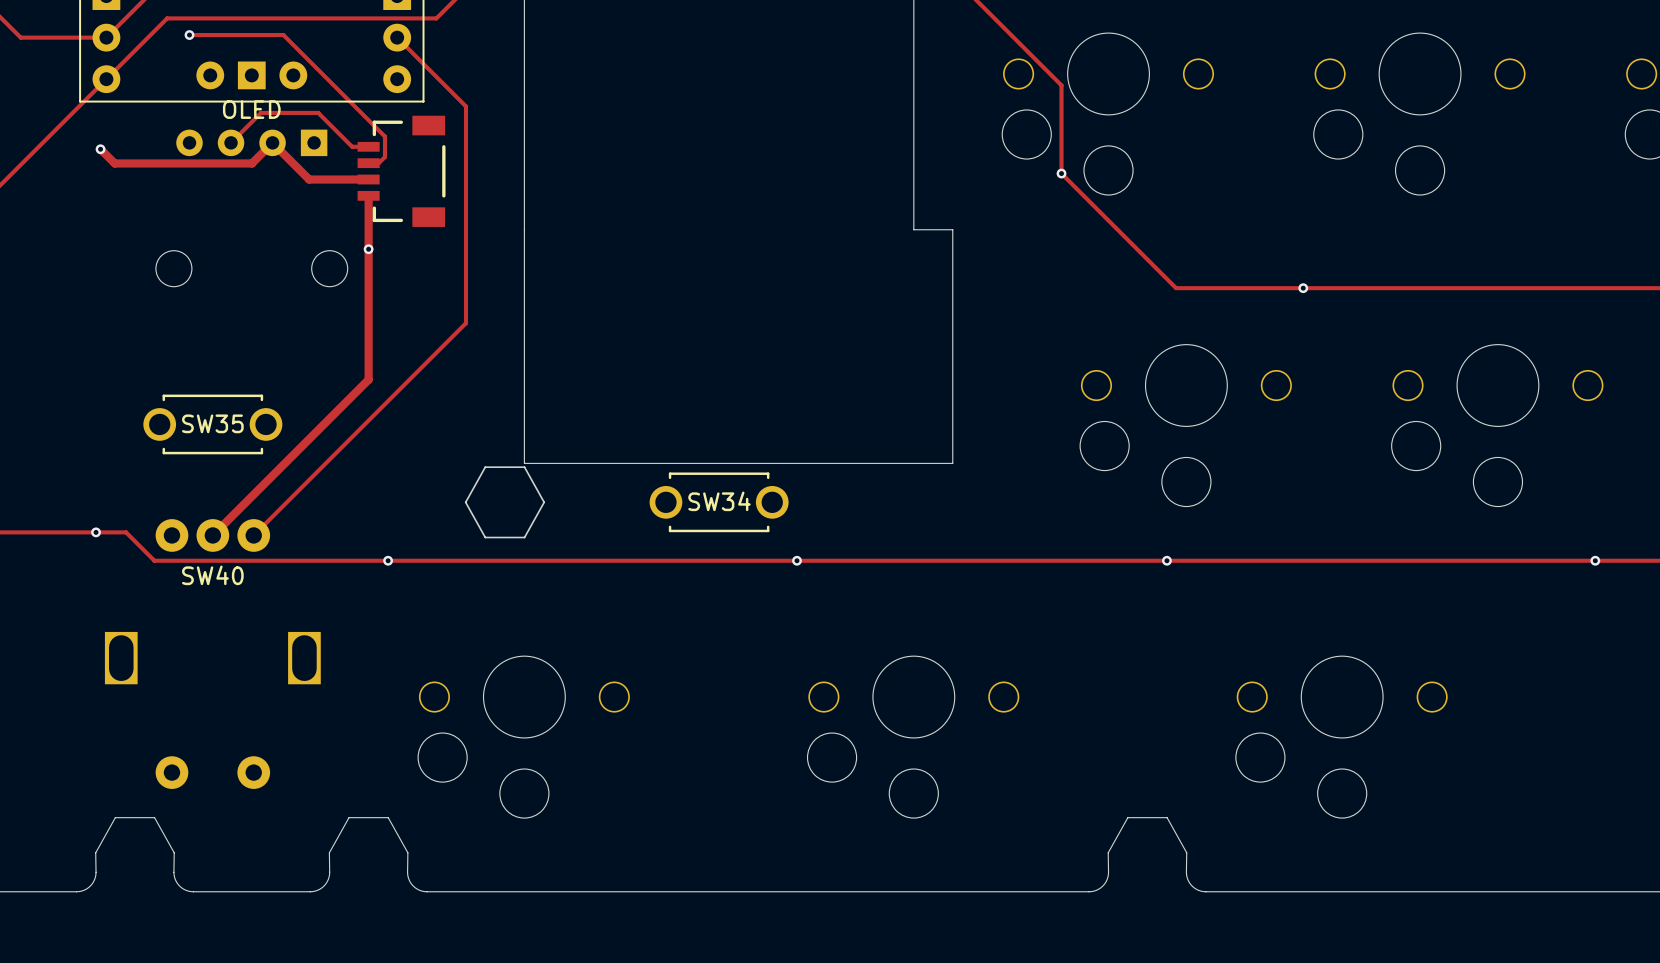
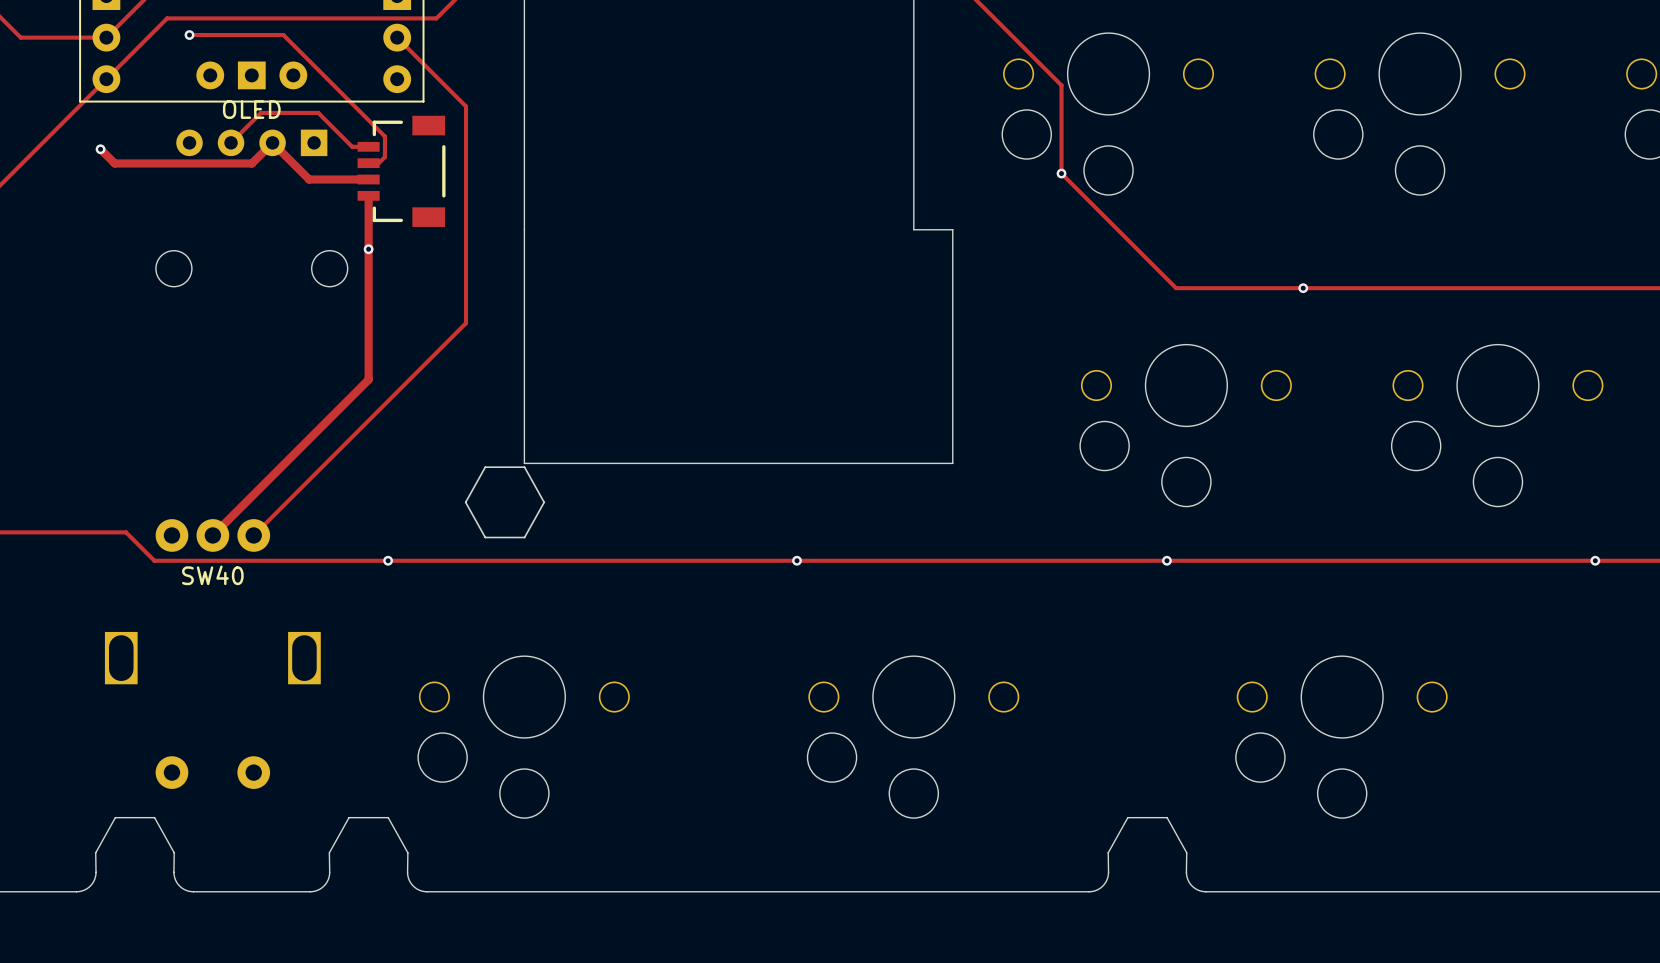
SW35: (212, 424) -> none
SW34: (719, 502) -> none
via: (96, 532) -> none

